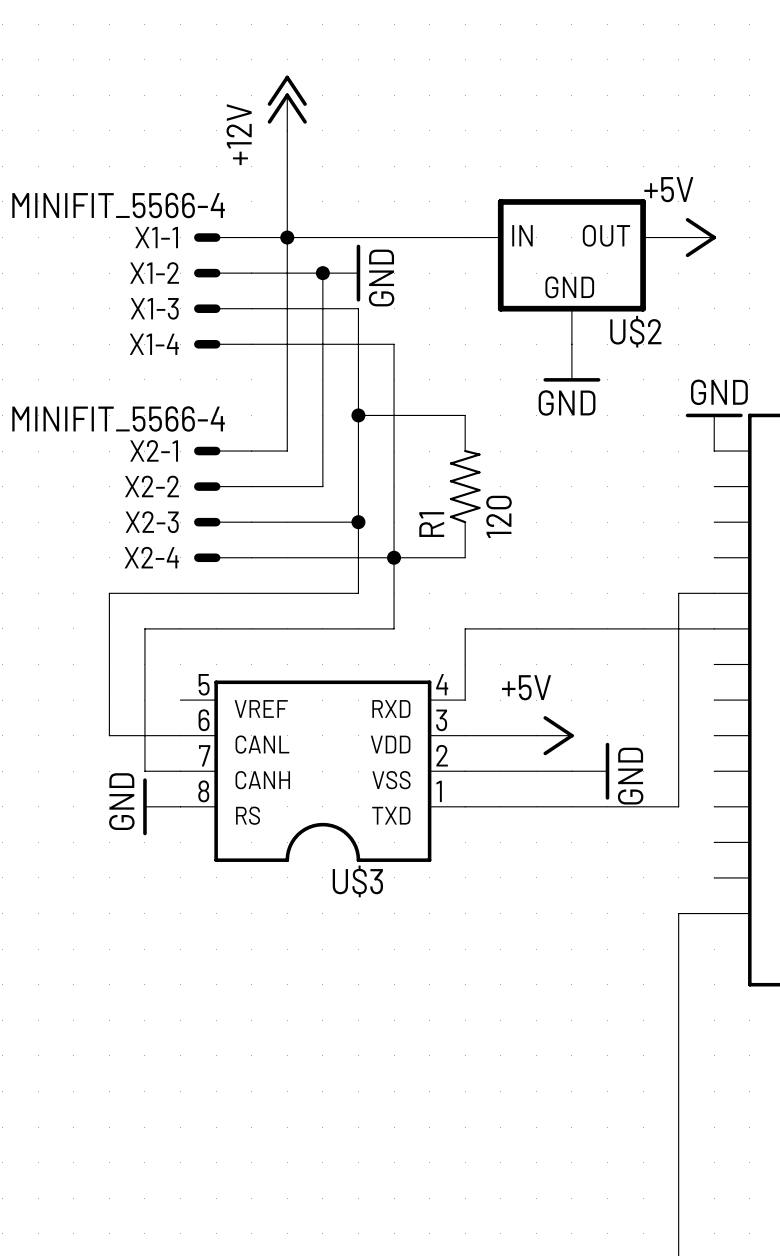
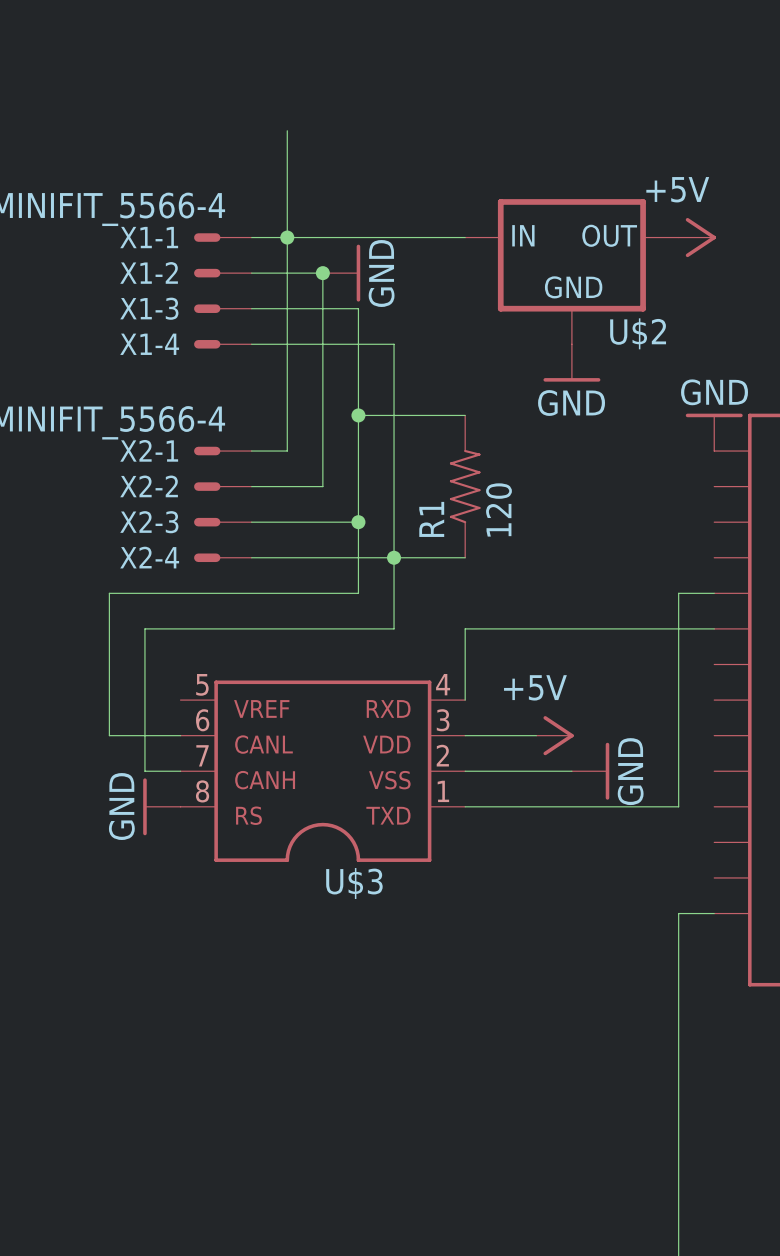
power symbol: +12V (287, 103) -> none

